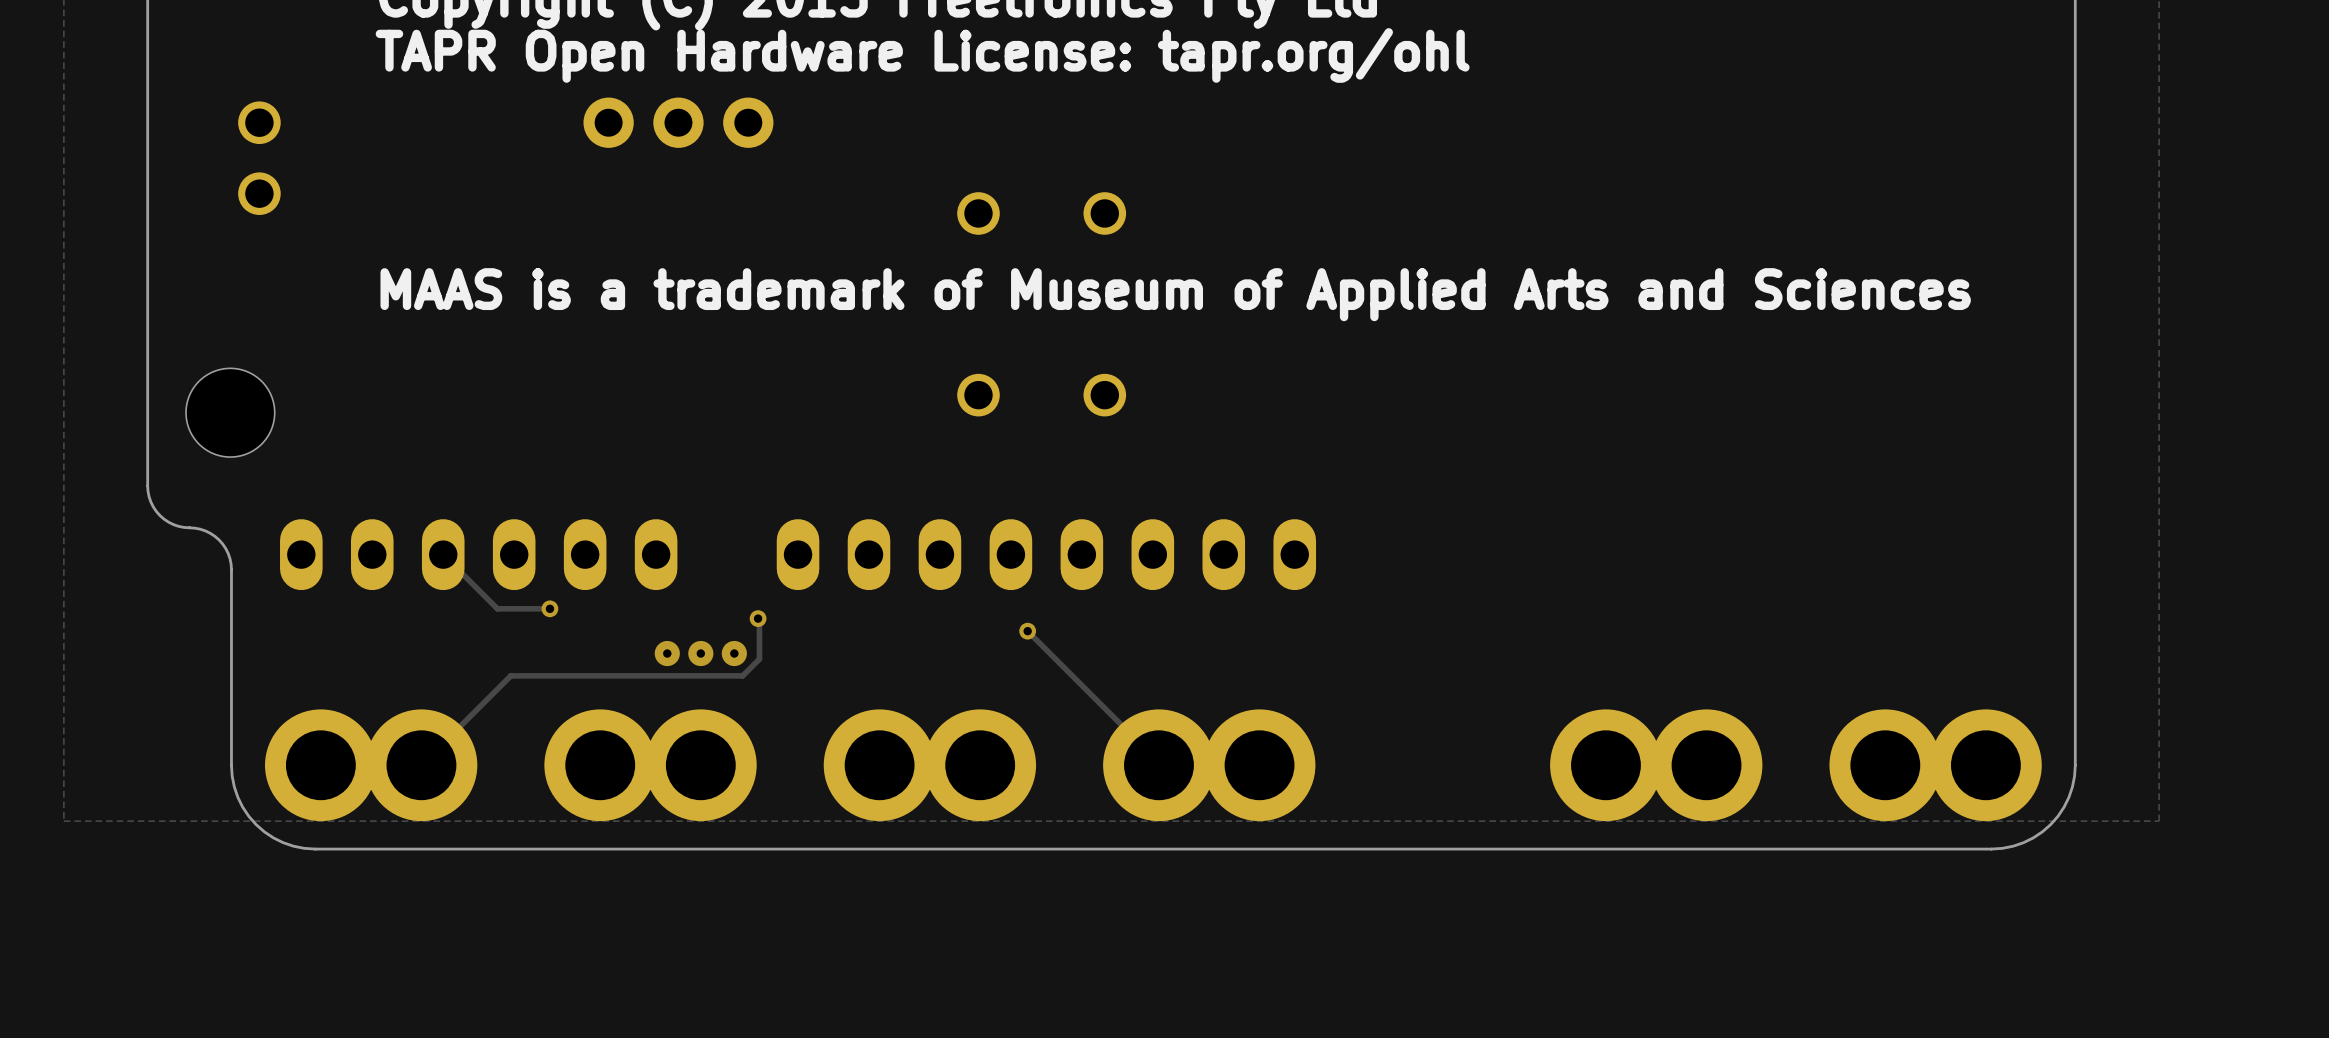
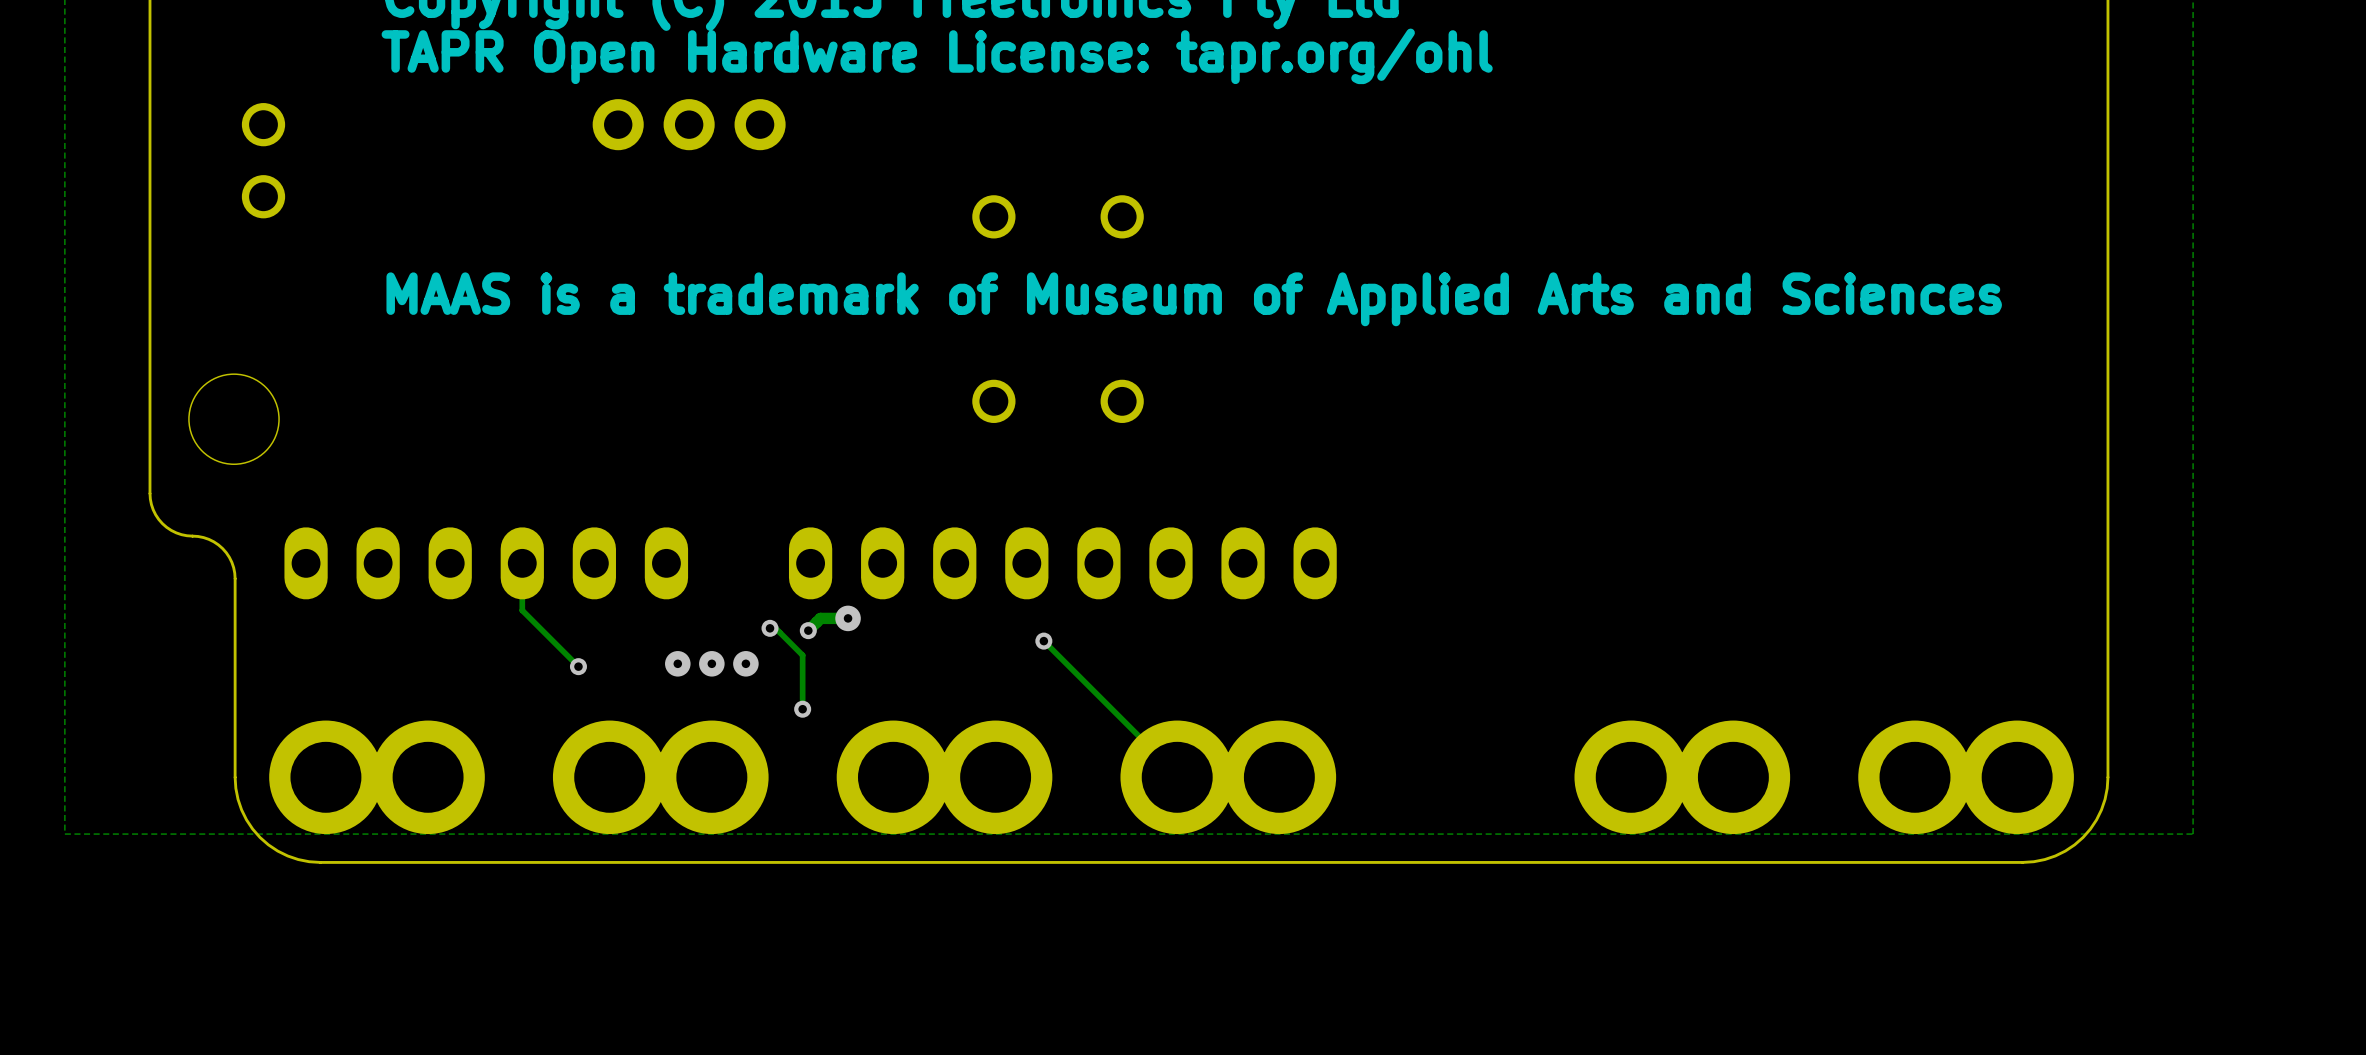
track: (443, 554) (497, 608) (549, 608) -> none
track: none -> (522, 563) (522, 610) (578, 666)
via position: (549, 608) -> (578, 666)
track: none -> (848, 618) (820, 618) (808, 630)
via: none -> (848, 618)
track: none -> (771, 624) (802, 655) (802, 709)
track: (758, 618) (759, 659) (742, 675) (510, 675) (421, 765) -> none
via: none -> (808, 630)
via: none -> (802, 709)

